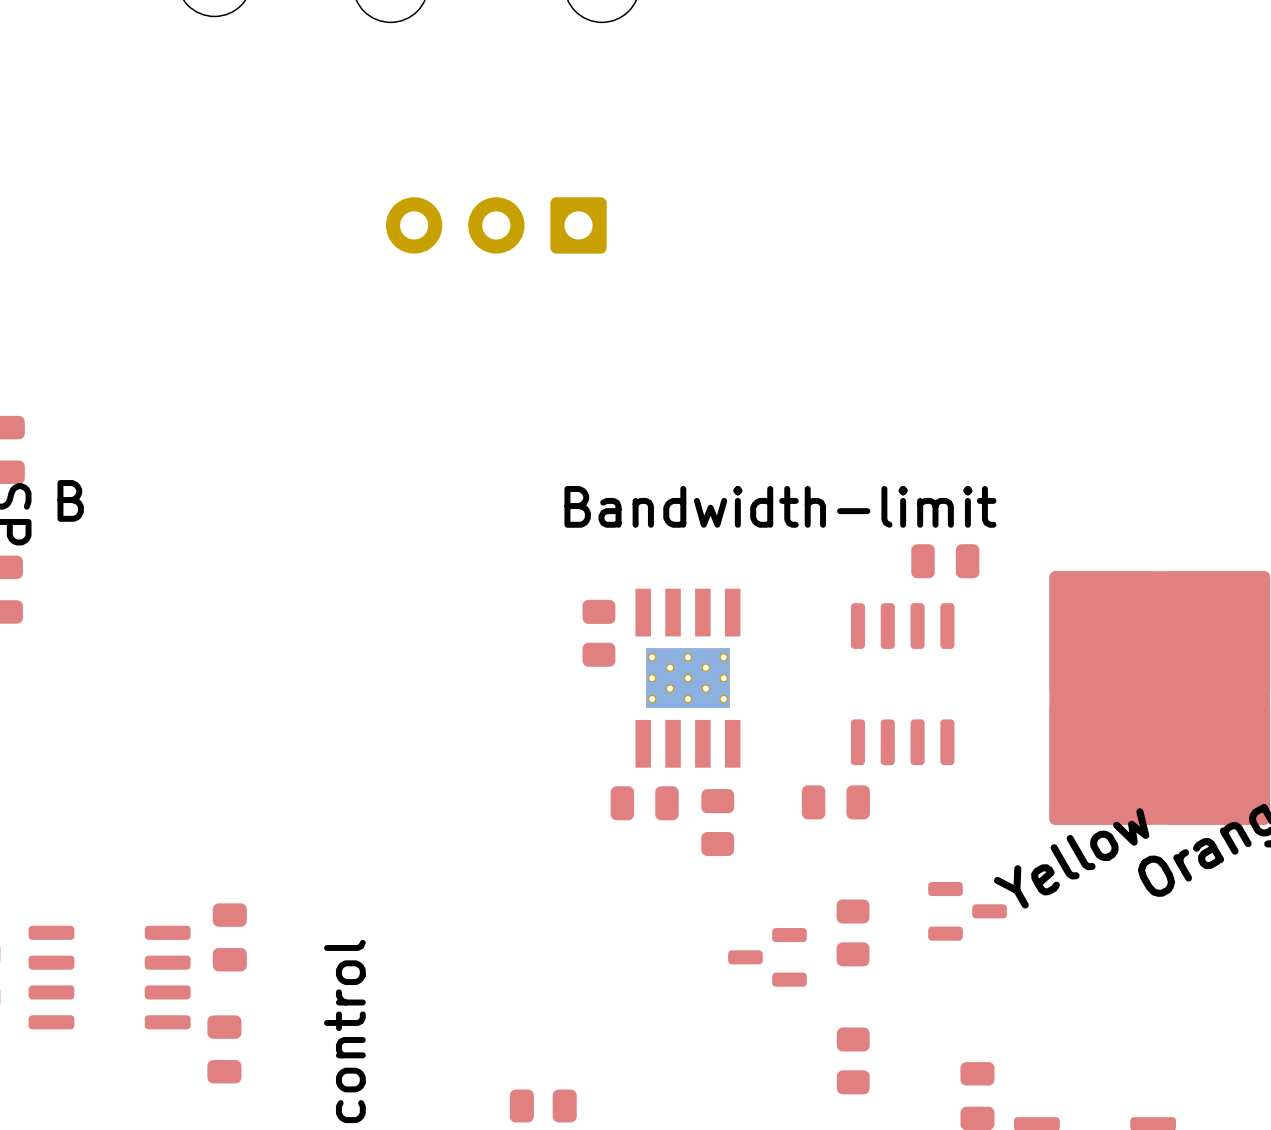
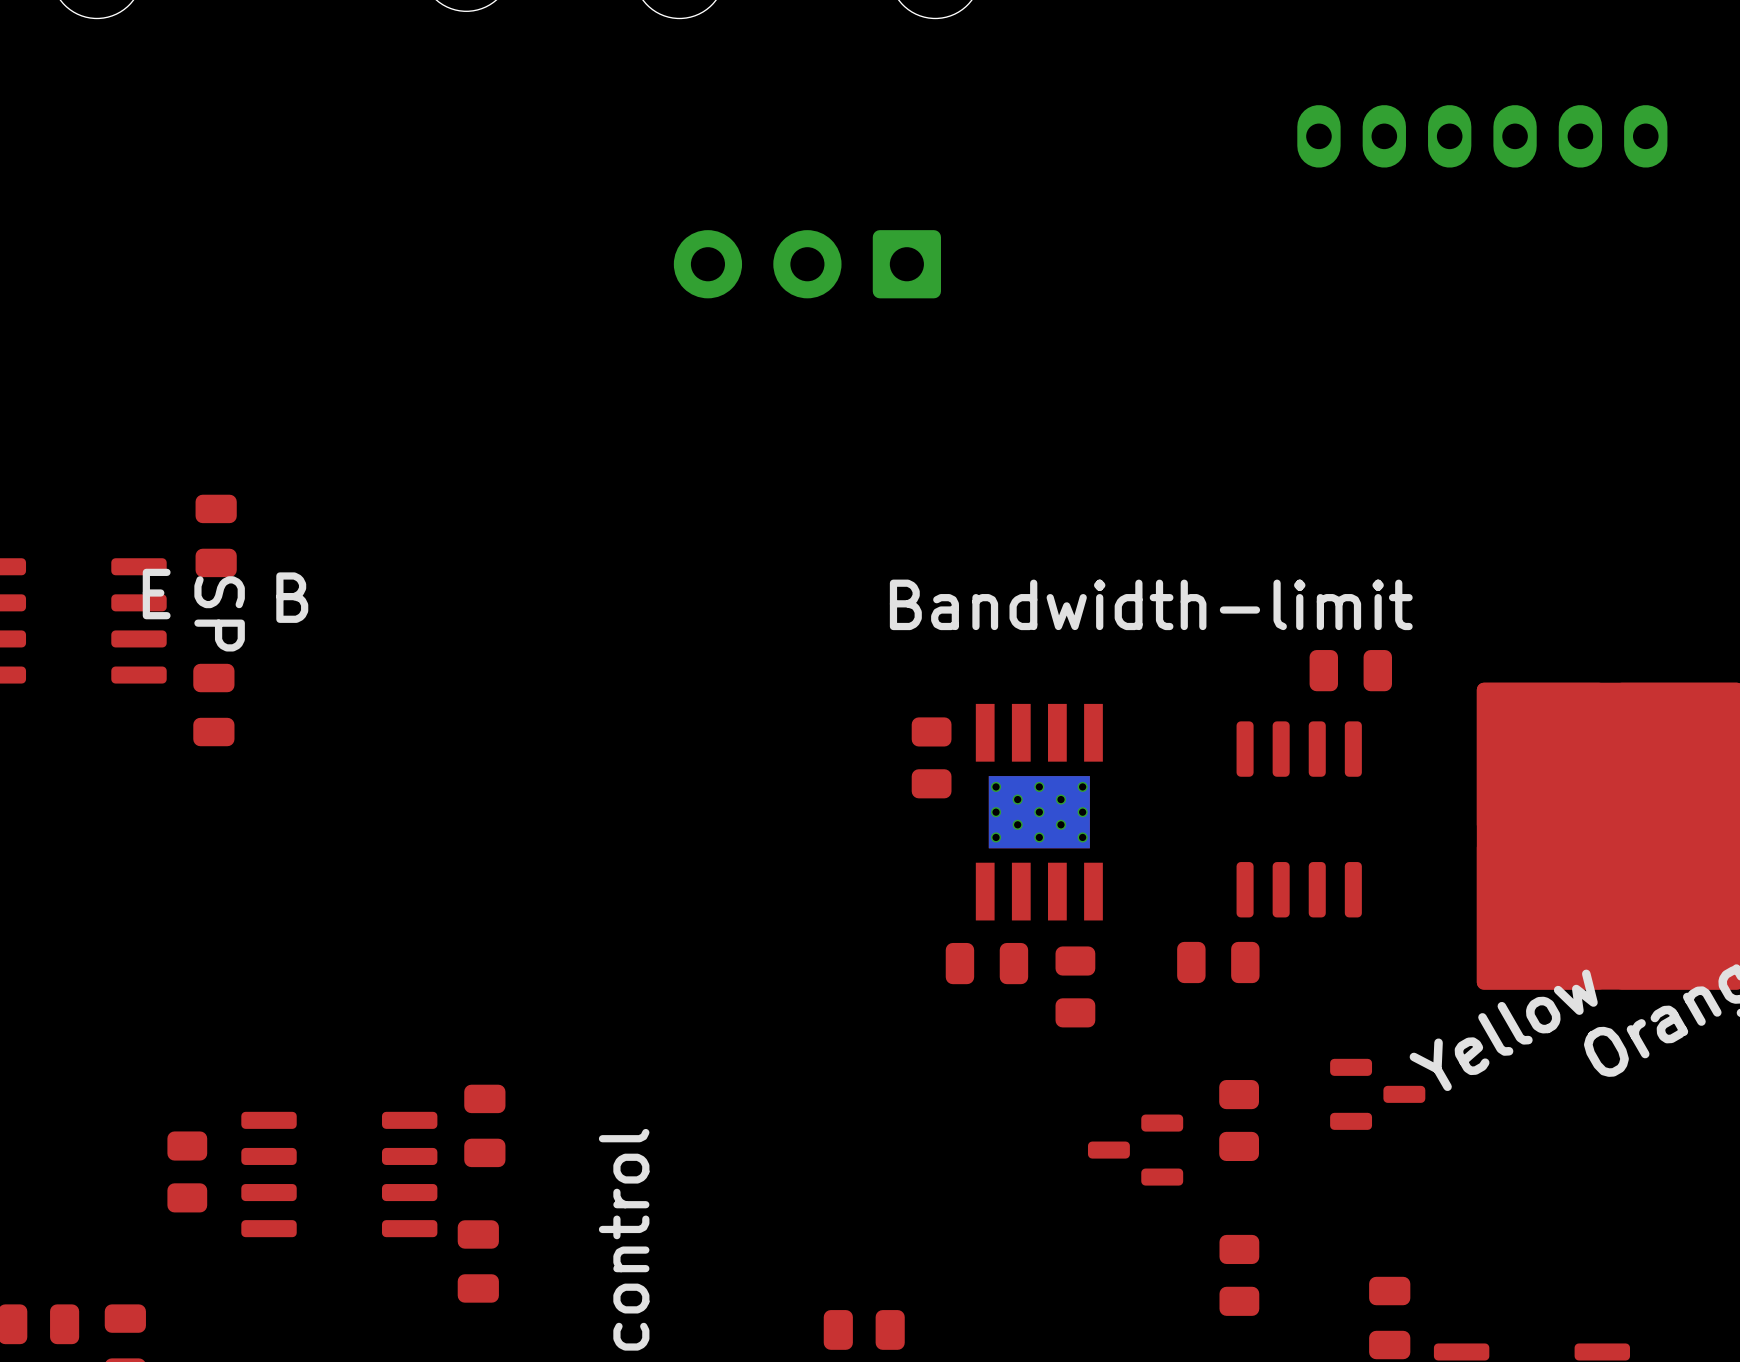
part: none -> (1482, 136)

